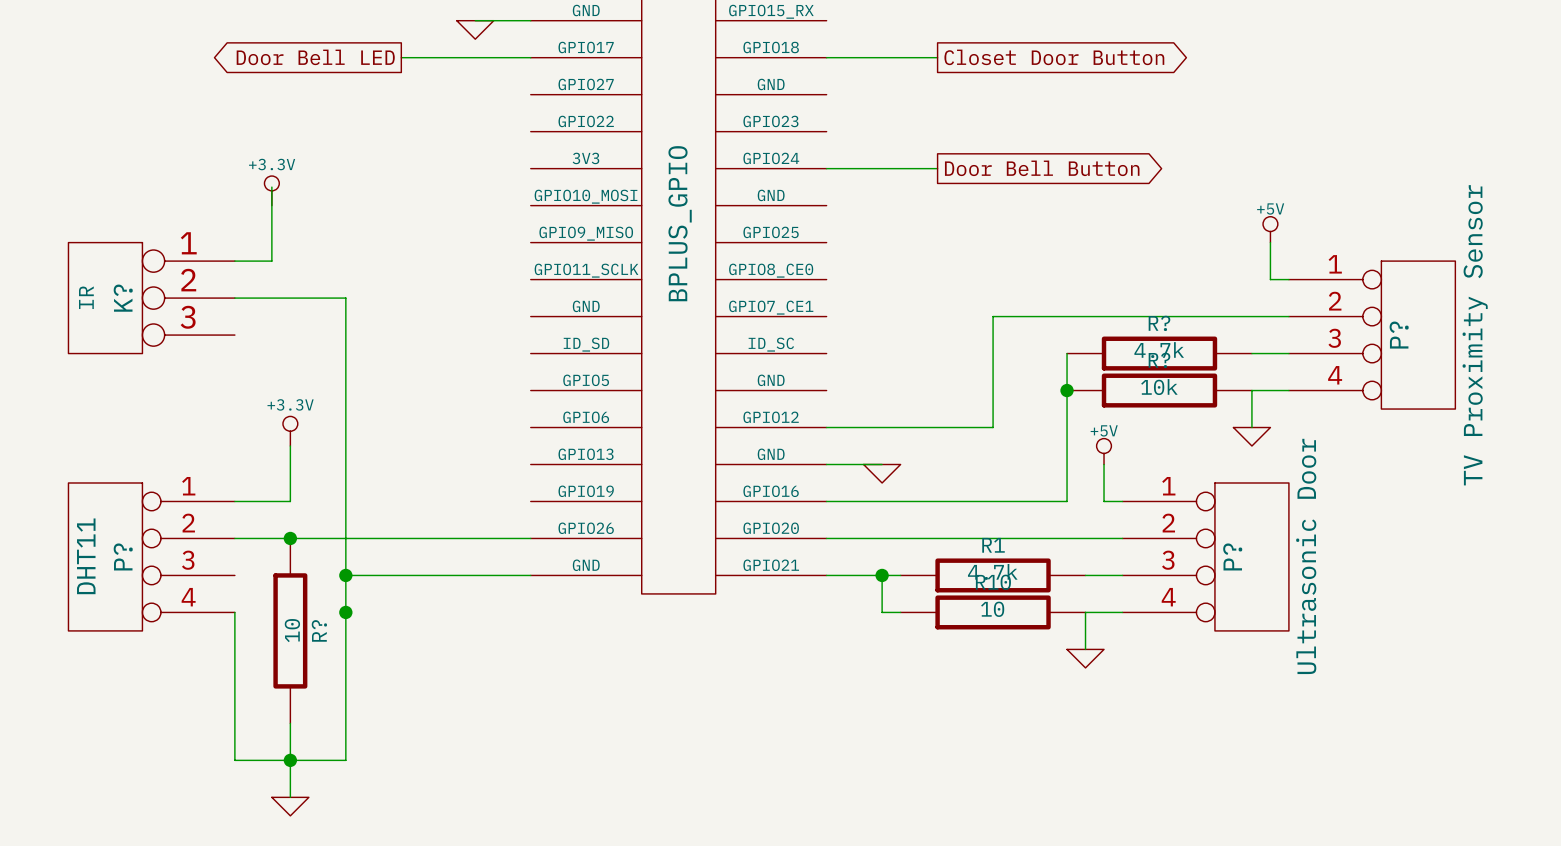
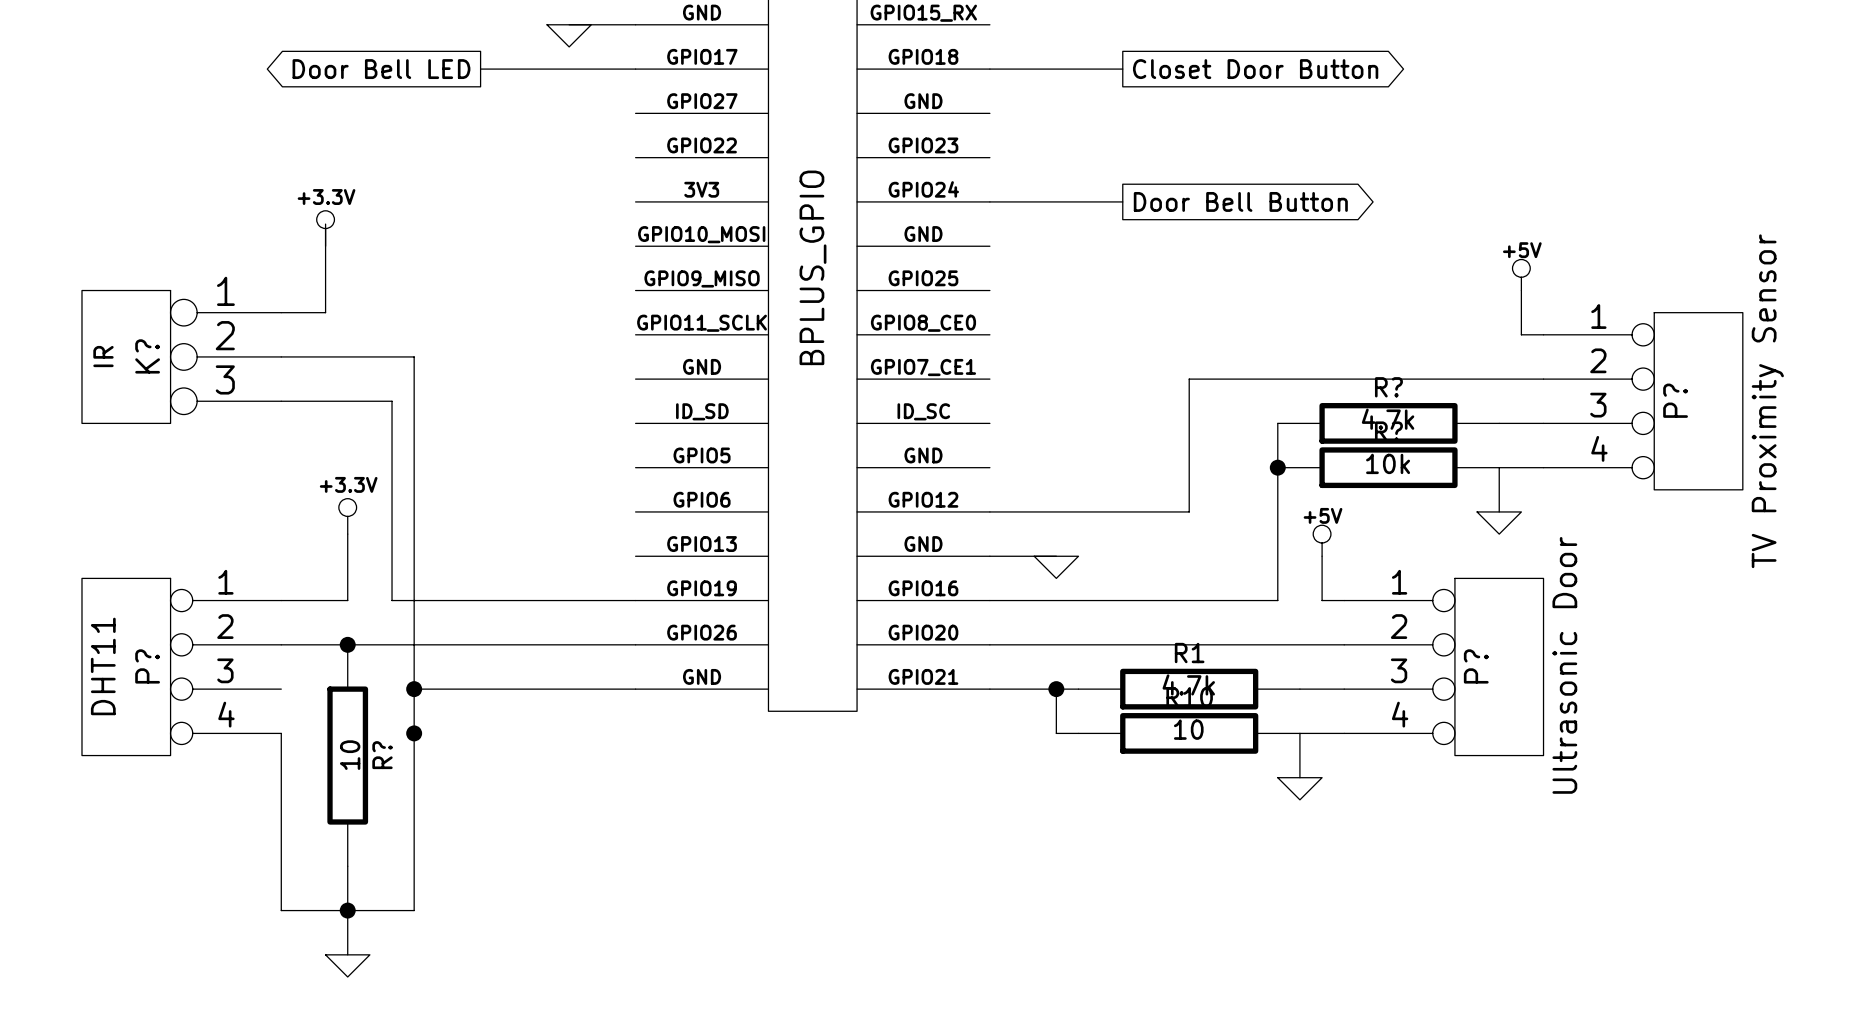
wire: none -> (281, 401) (392, 401) (392, 600) (635, 600)

